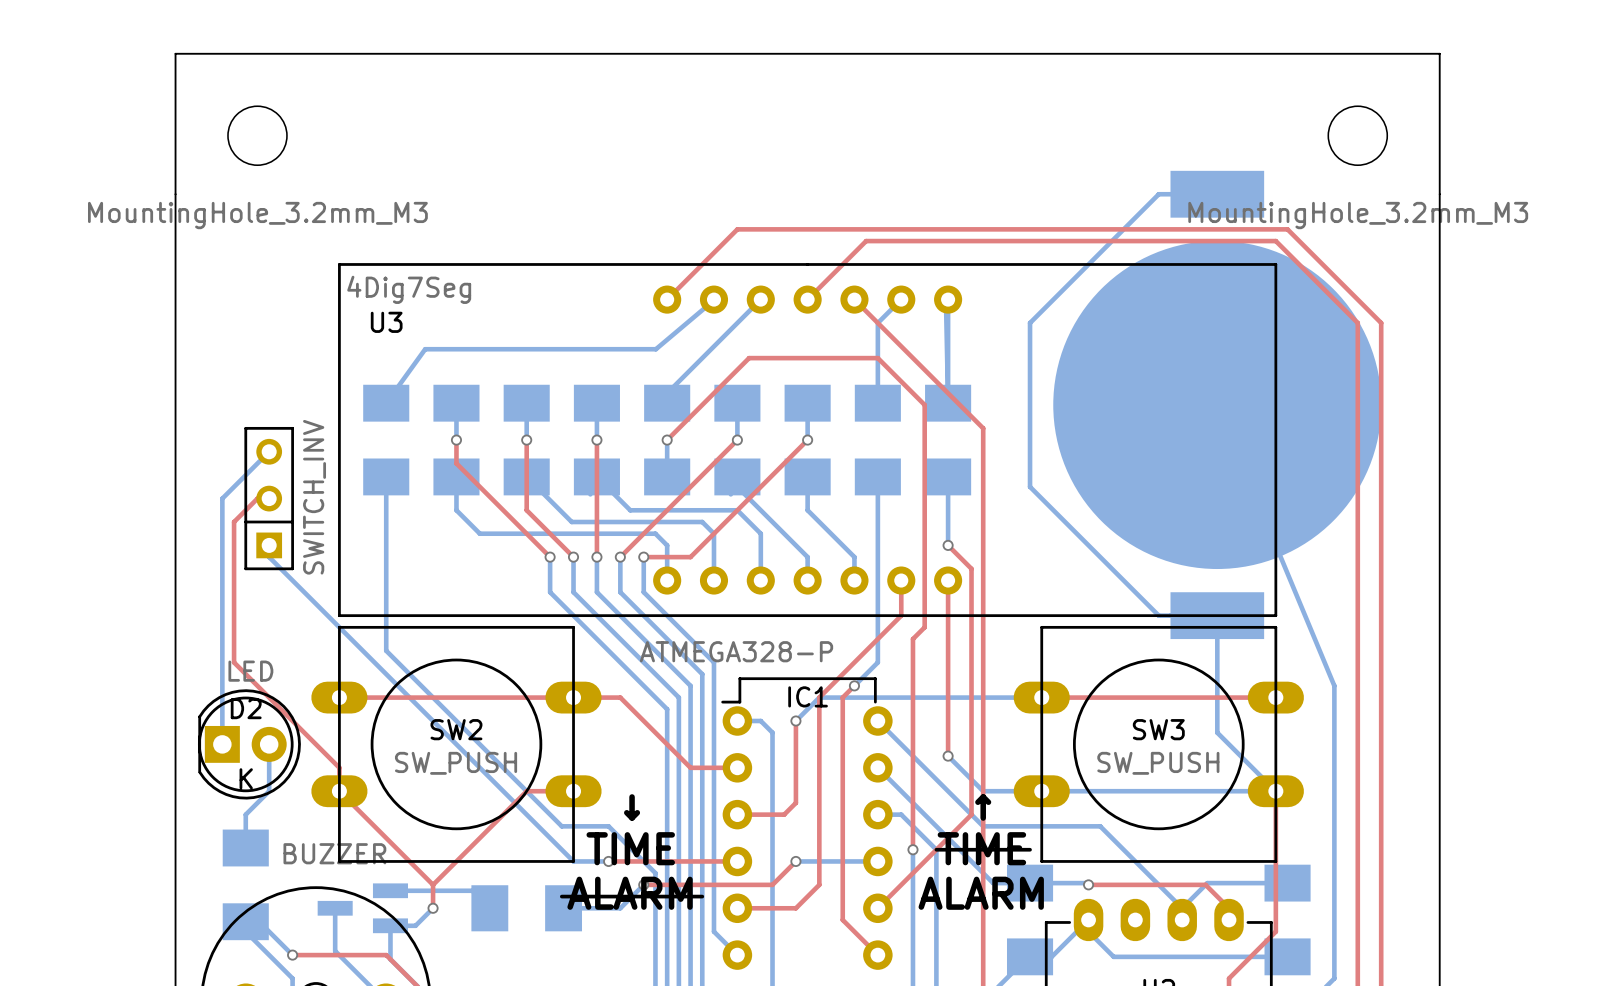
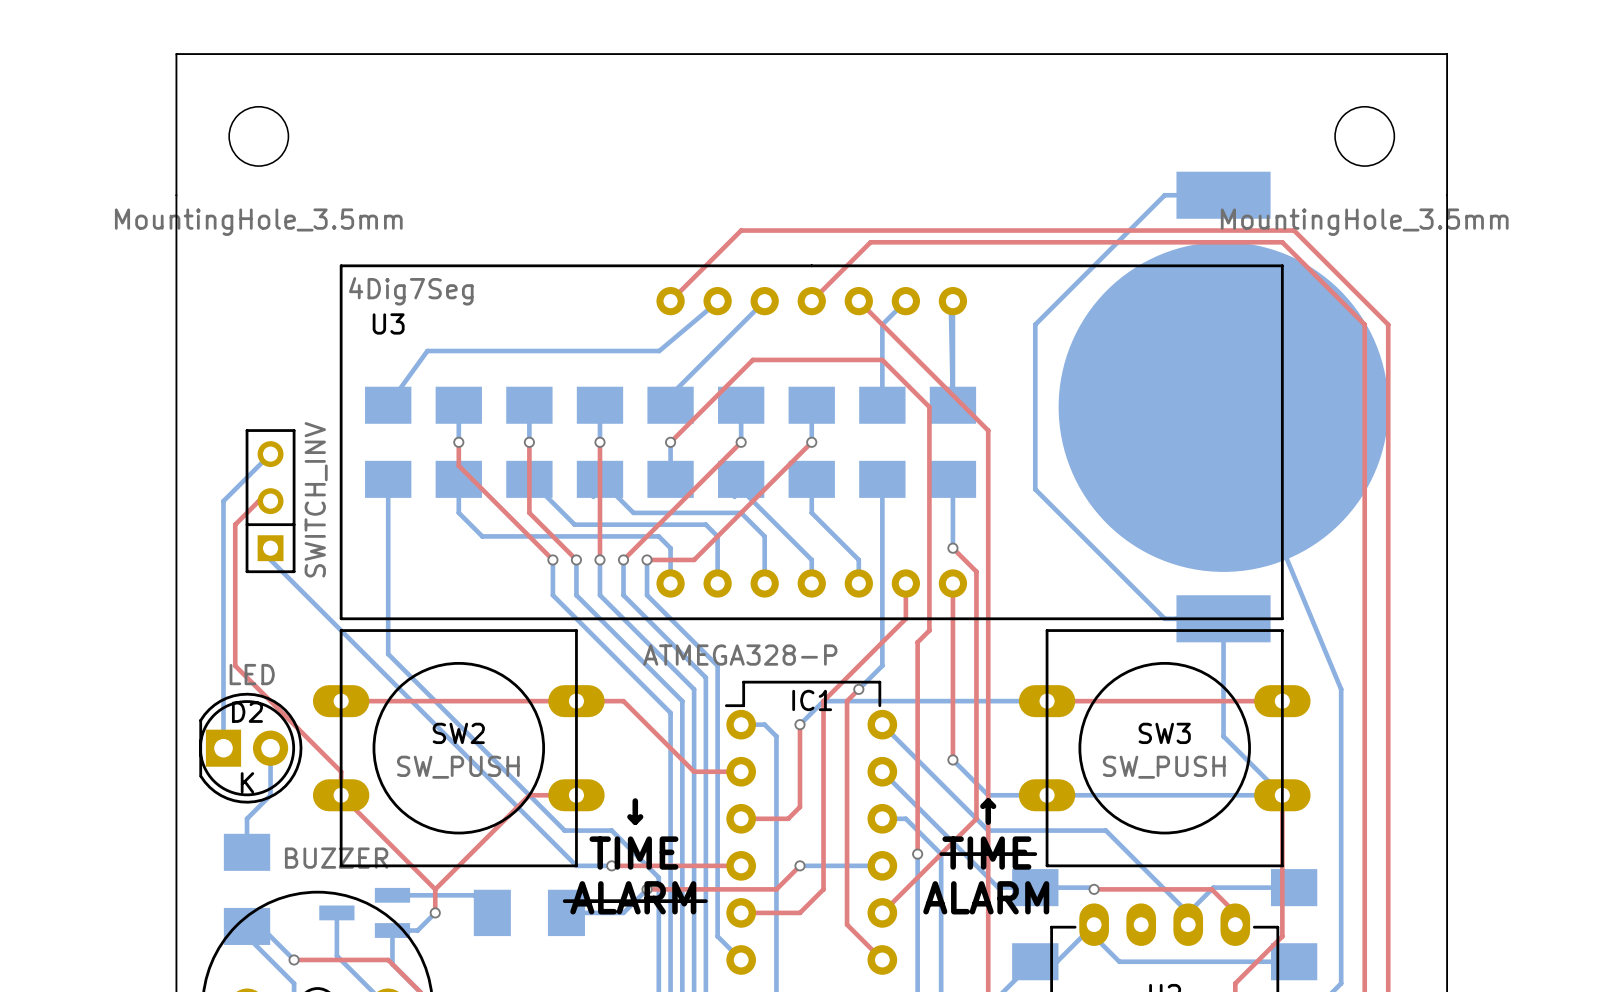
part value: MountingHole_3.2mm_M3 (257, 215) -> MountingHole_3.5mm (258, 222)
part value: MountingHole_3.2mm_M3 (1358, 215) -> MountingHole_3.5mm (1364, 222)

